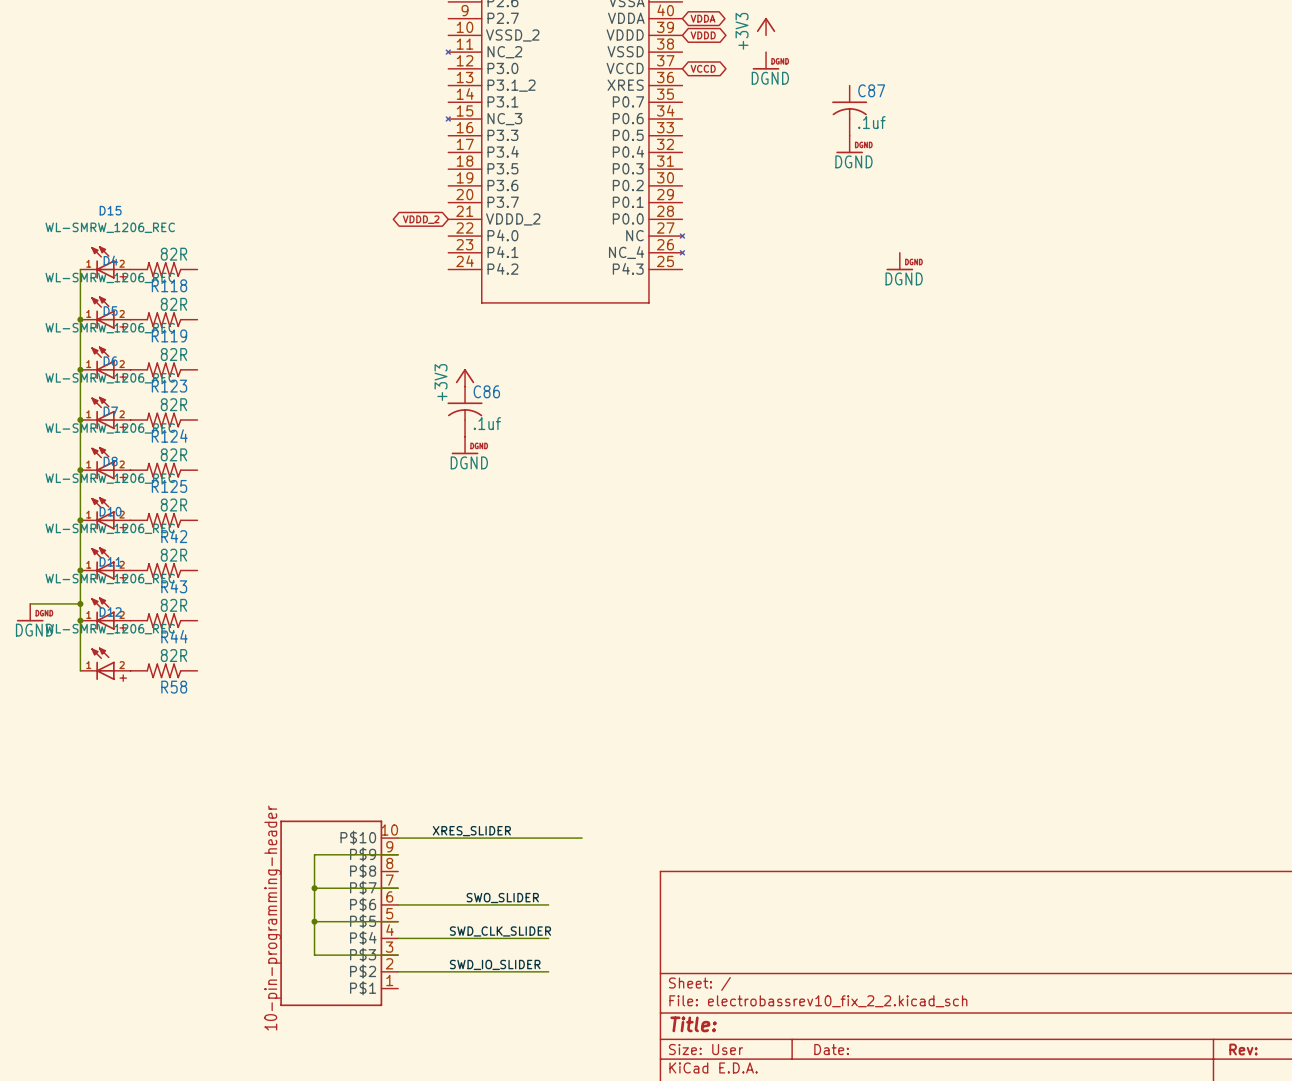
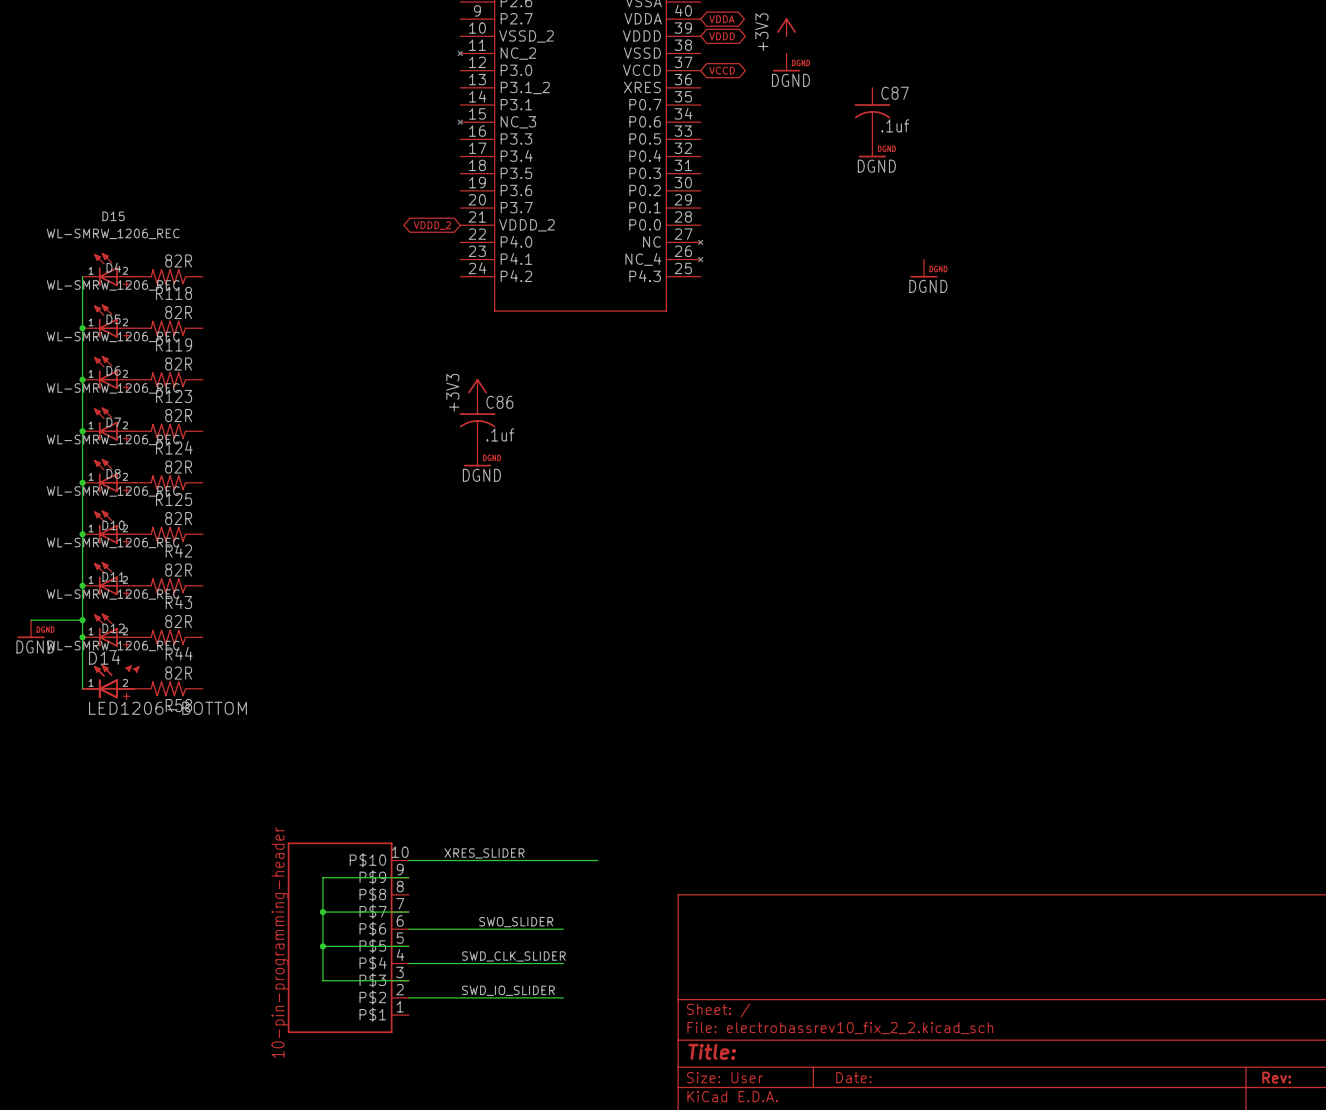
D14: none -> LED1206-BOTTOM (111, 681)

